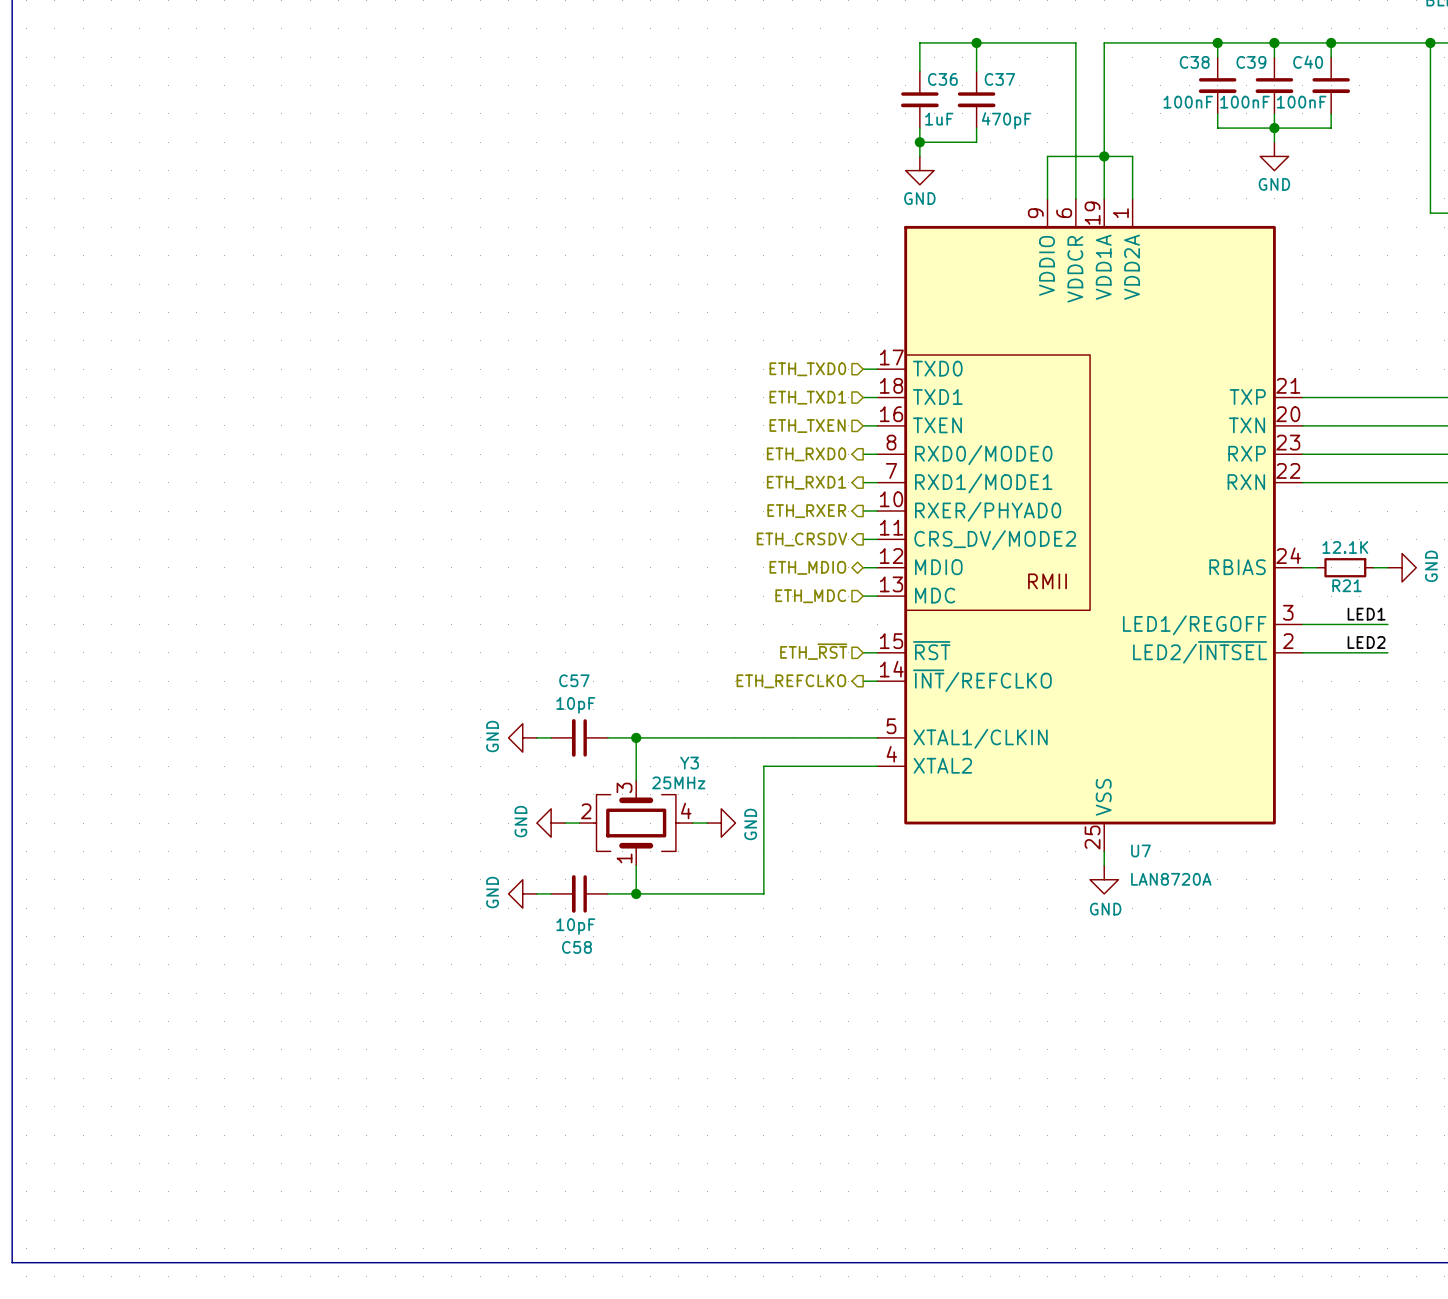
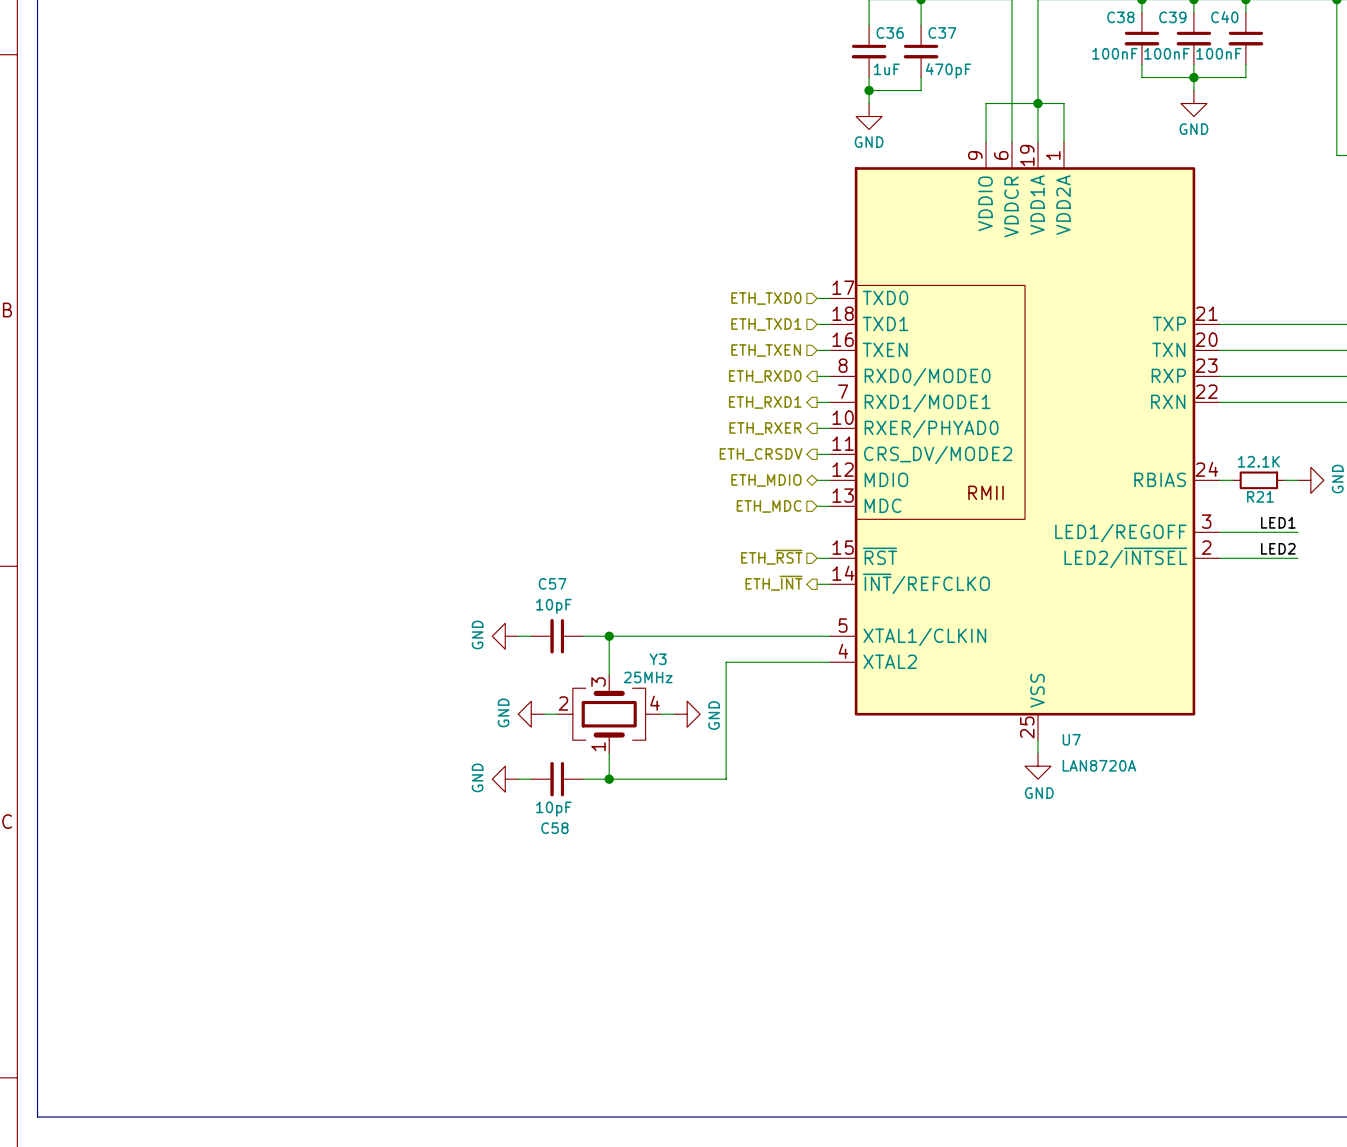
hierarchical label: ETH_REFCLKO (791, 681) -> ETH_~{INT} (774, 583)

